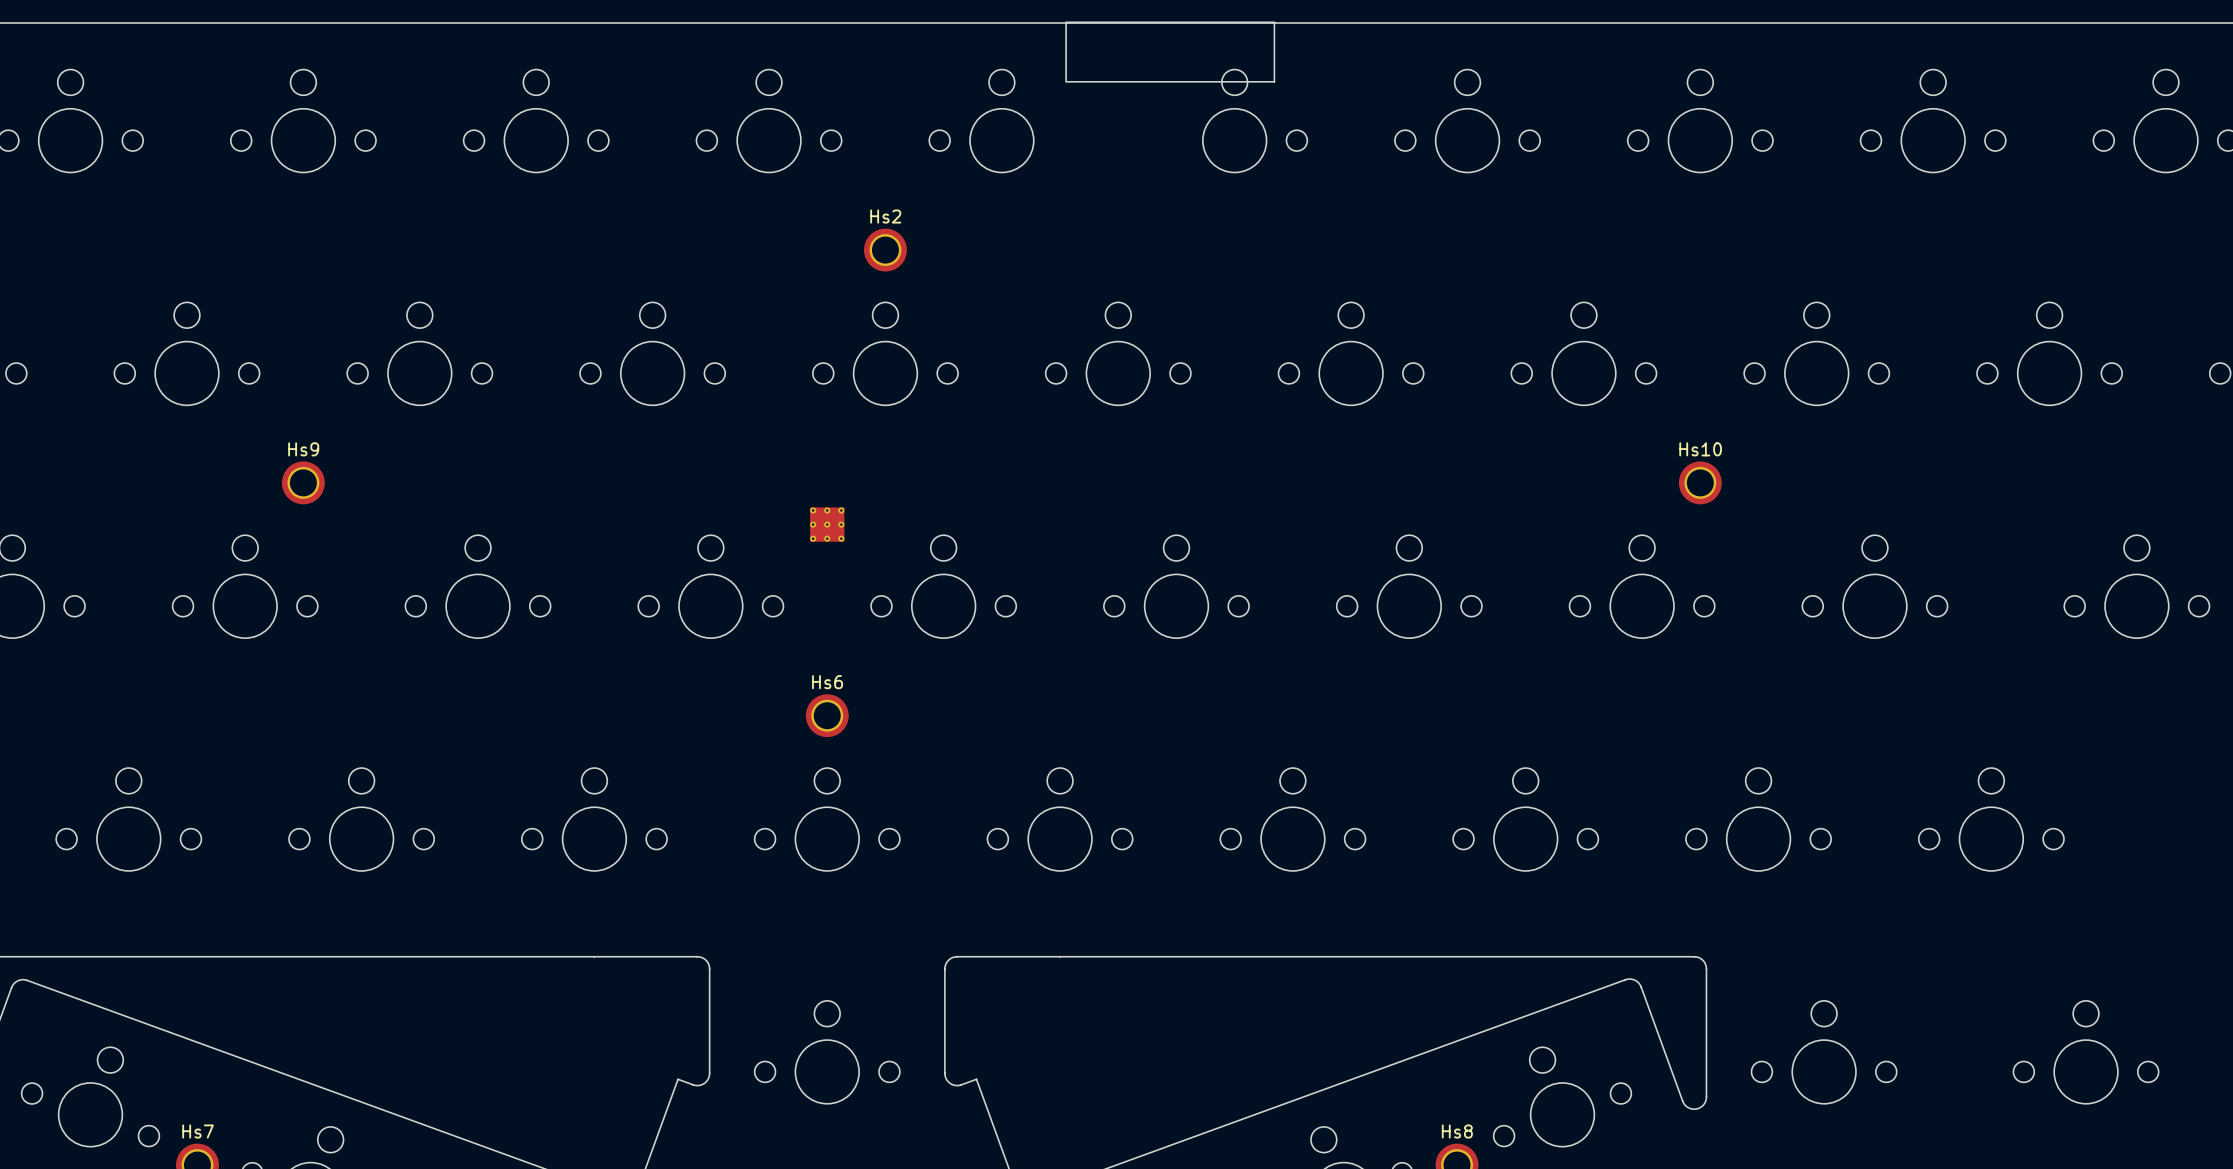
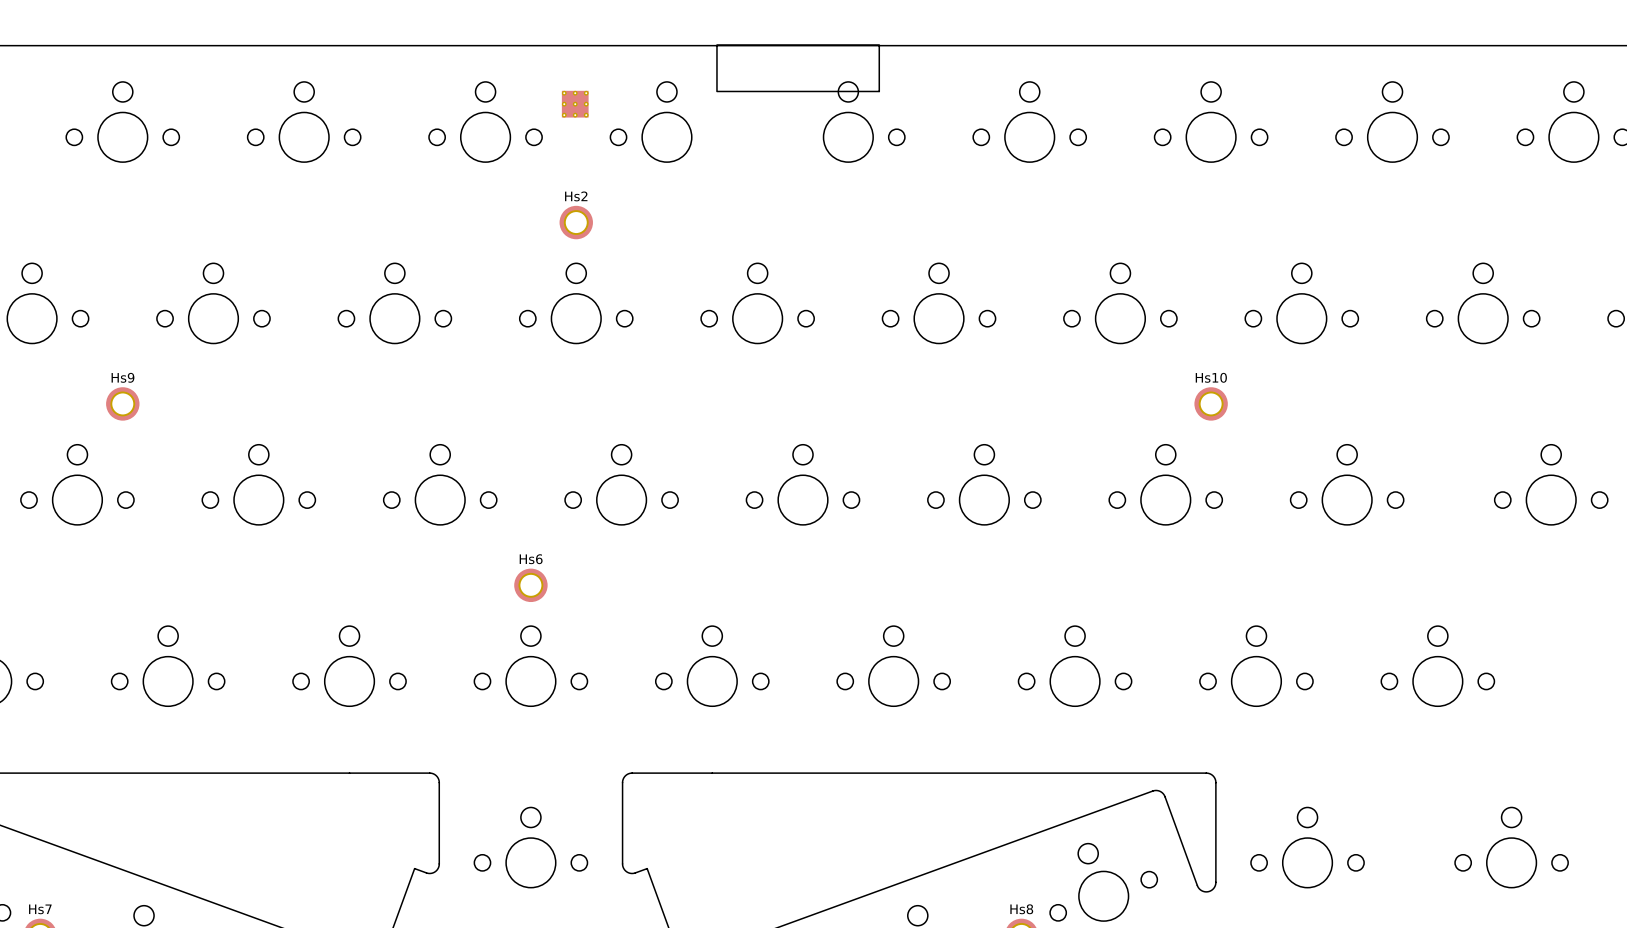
part: none -> (575, 104)
part: (827, 524) -> none

